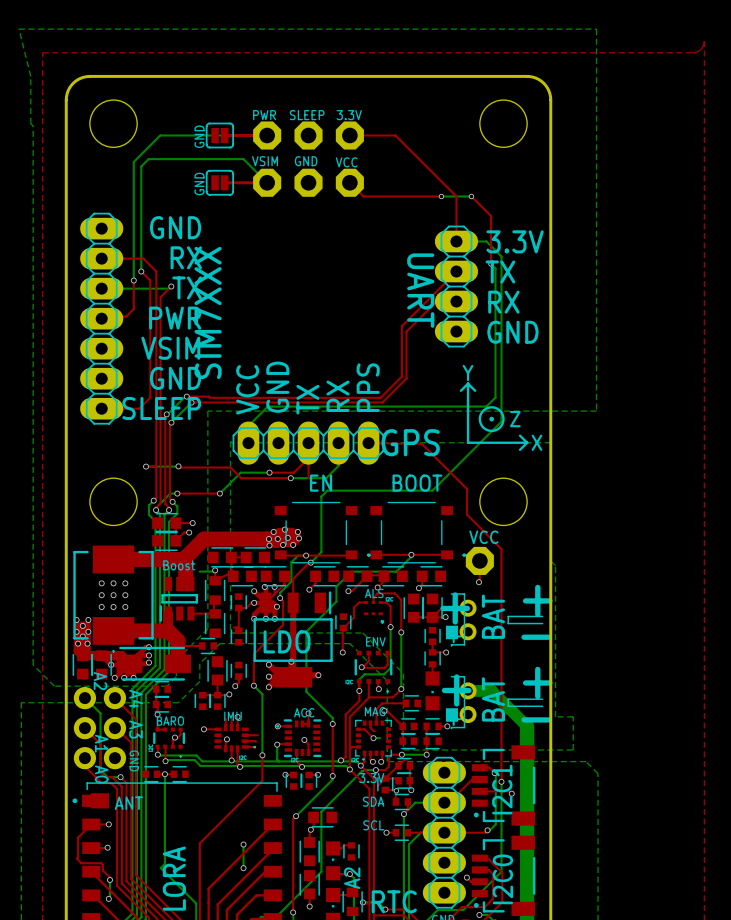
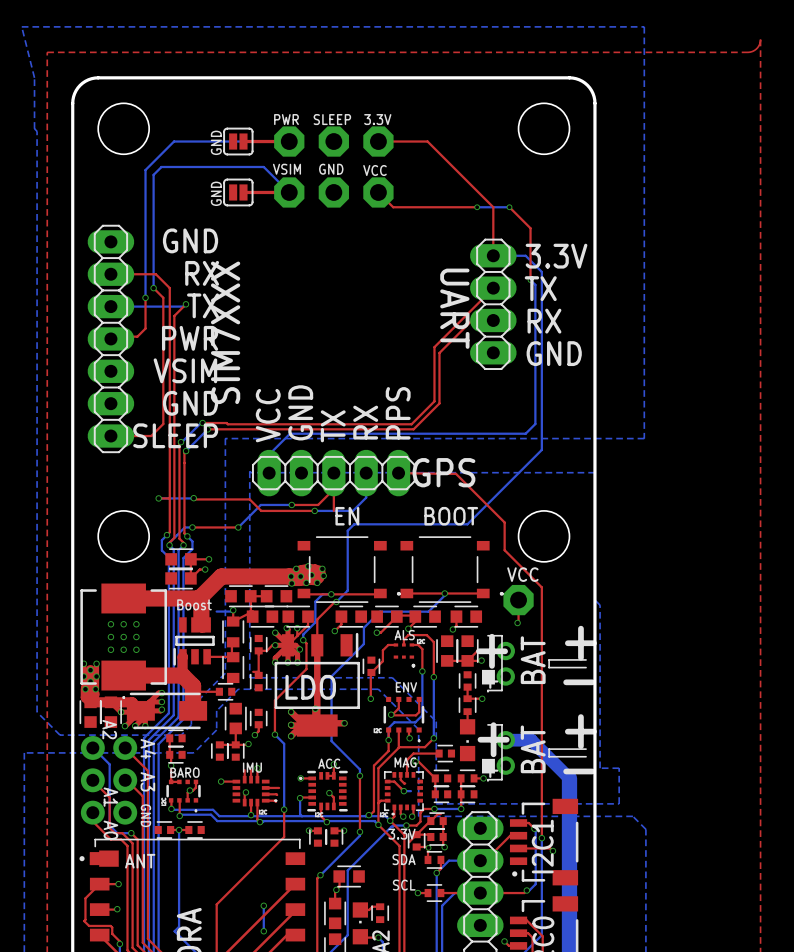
text: Y (468, 373) -> none
line: (468, 383) (468, 442) (527, 442) -> none
line: (468, 383) (460, 390) -> none
line: (468, 383) (475, 390) -> none
drawing: [478, 406, 505, 433] -> none
text: Z (515, 419) -> none
line: (520, 435) (527, 442) -> none
line: (527, 442) (520, 449) -> none
text: X (536, 442) -> none

